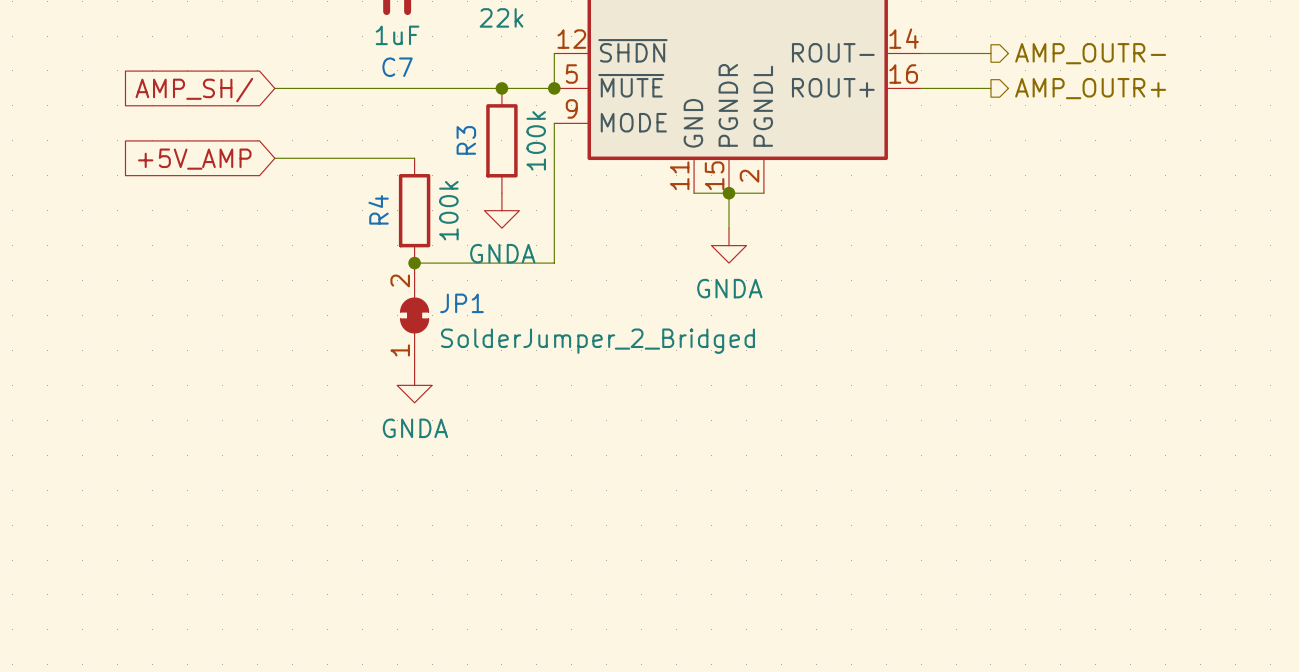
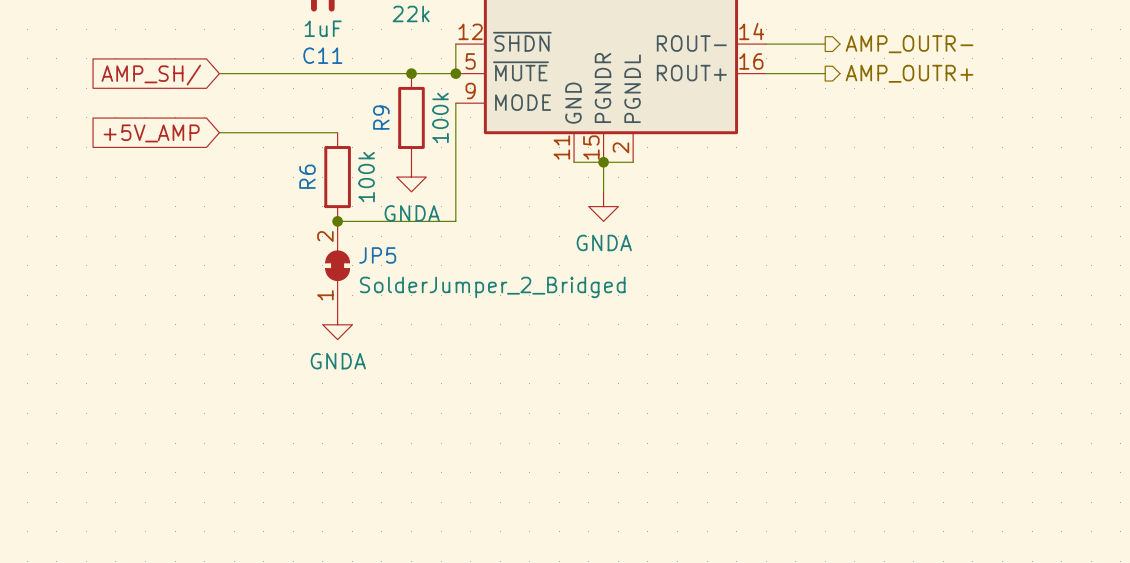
C7 name: C7 (397, 67) -> C11 (322, 55)
R3 name: R3 (466, 140) -> R9 (381, 117)
R4 name: R4 (378, 209) -> R6 (307, 176)
JP1 name: JP1 (461, 303) -> JP5 (377, 255)

